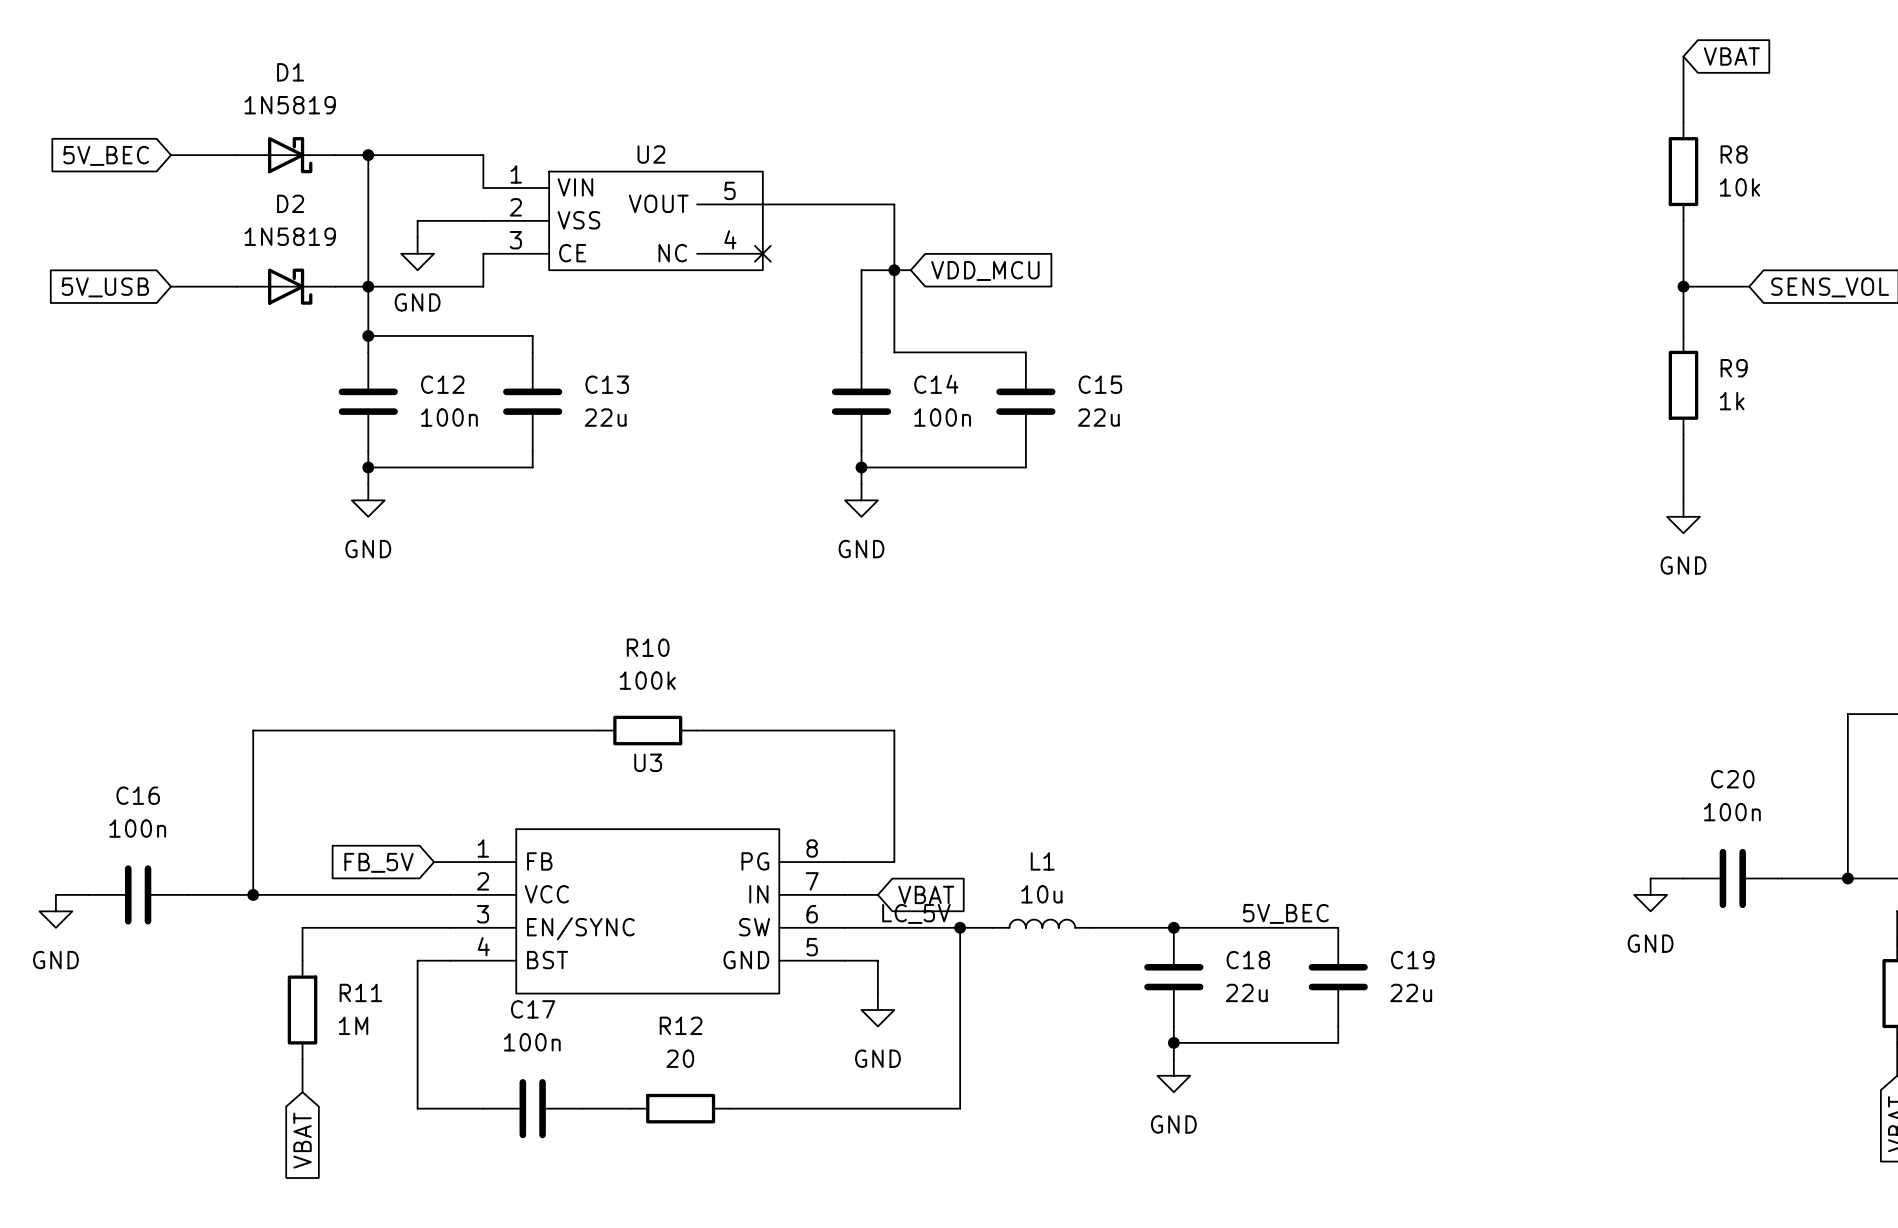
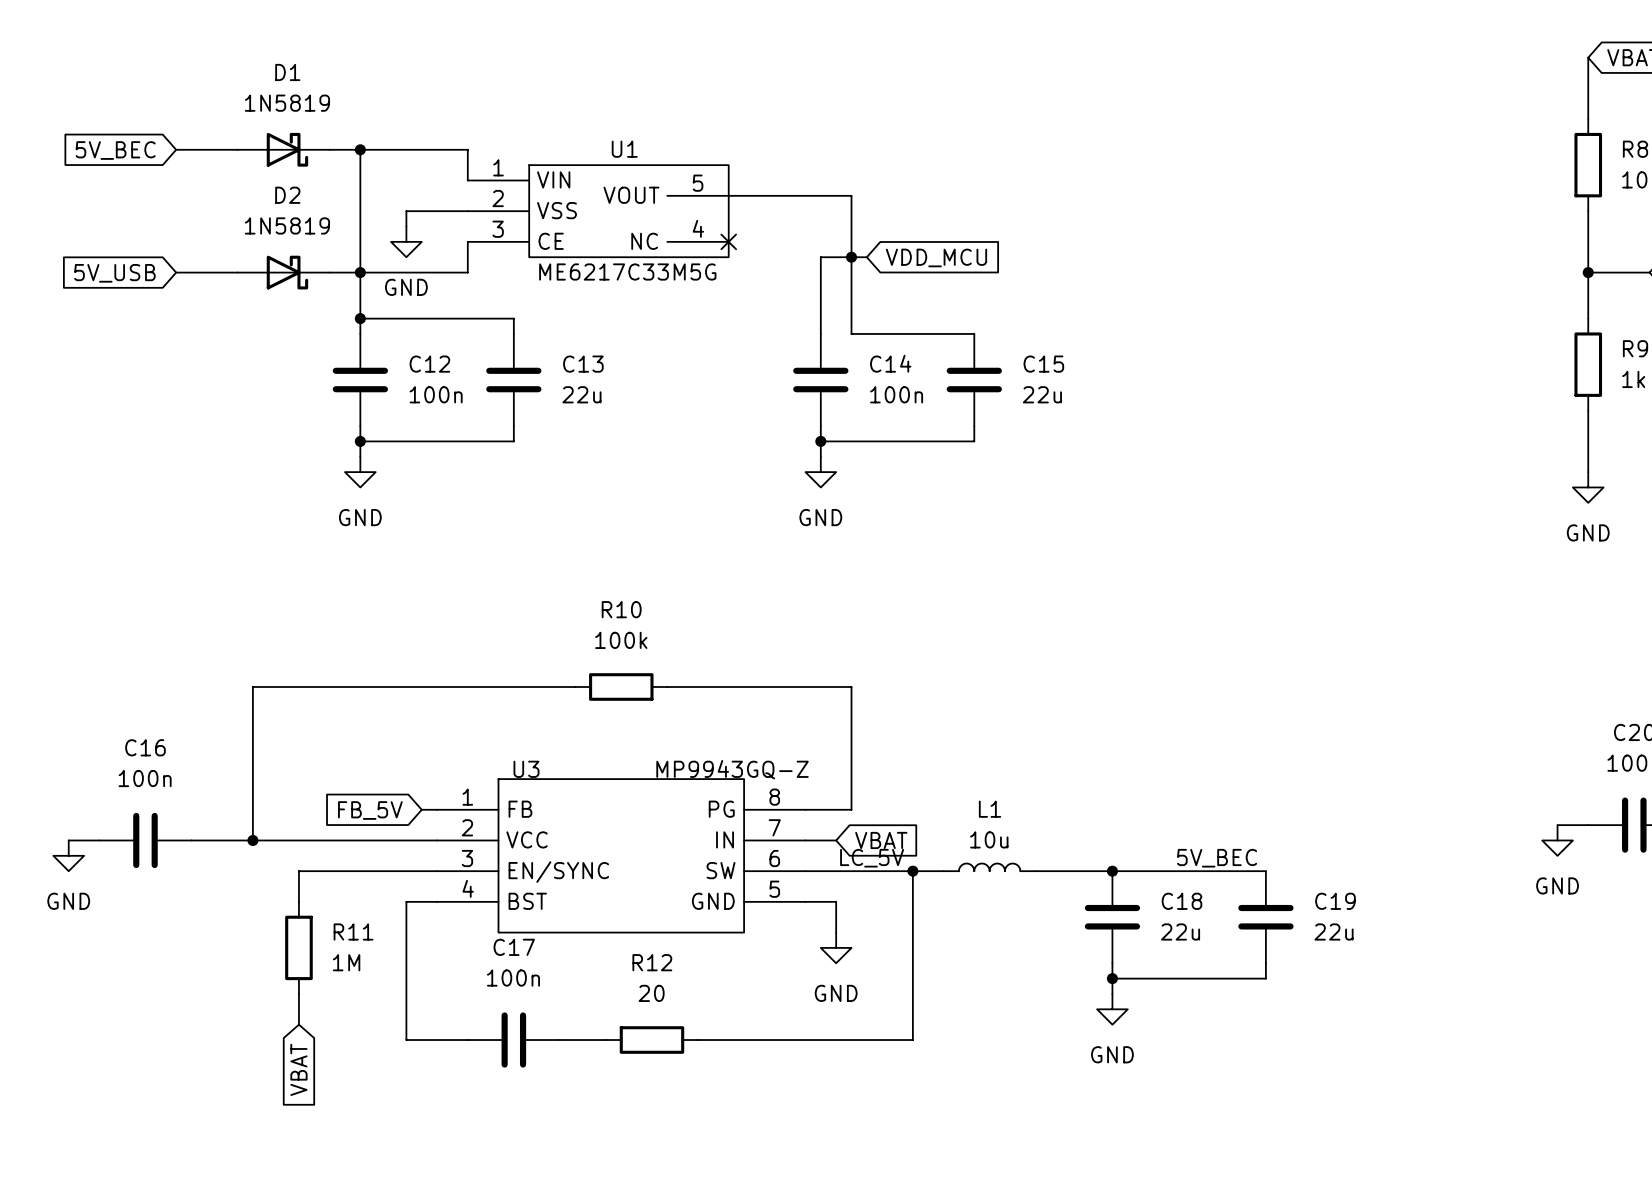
U2 name: U2 (651, 154) -> U1 (624, 149)
U2 value: none -> ME6217C33M5G (627, 272)
U3 name position: U3 (648, 762) -> U3 (526, 769)
U3 value: none -> MP9943GQ-Z (732, 769)

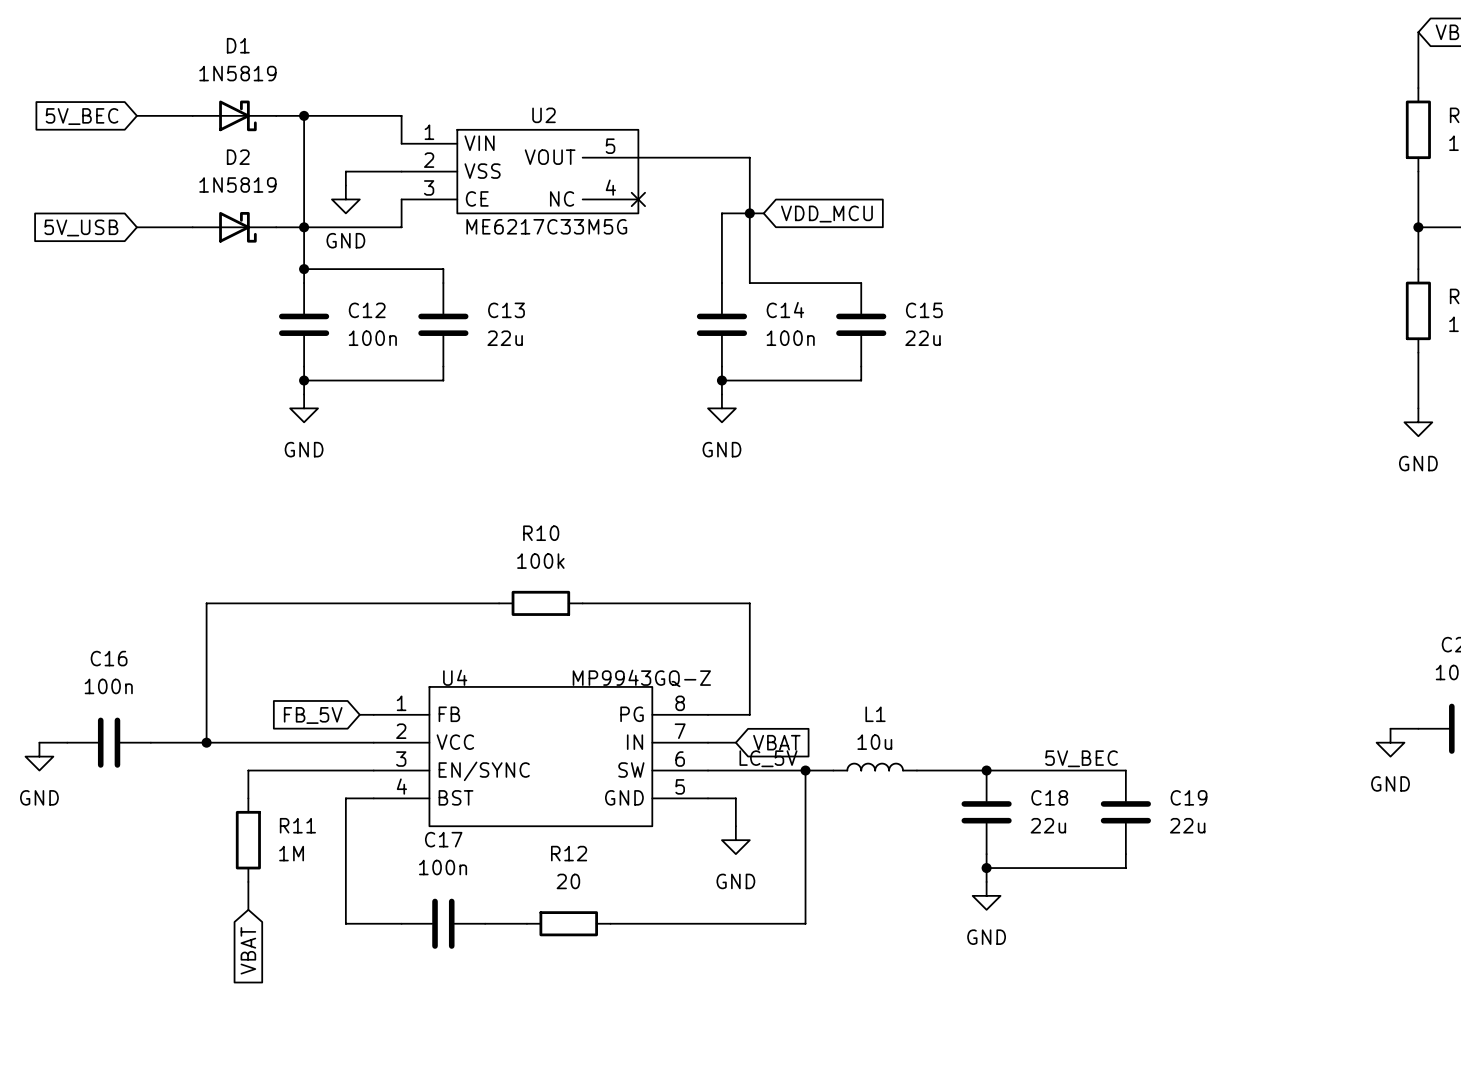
U1 name: U1 (624, 149) -> U2 (543, 115)
U3 name: U3 (526, 769) -> U4 (455, 677)

